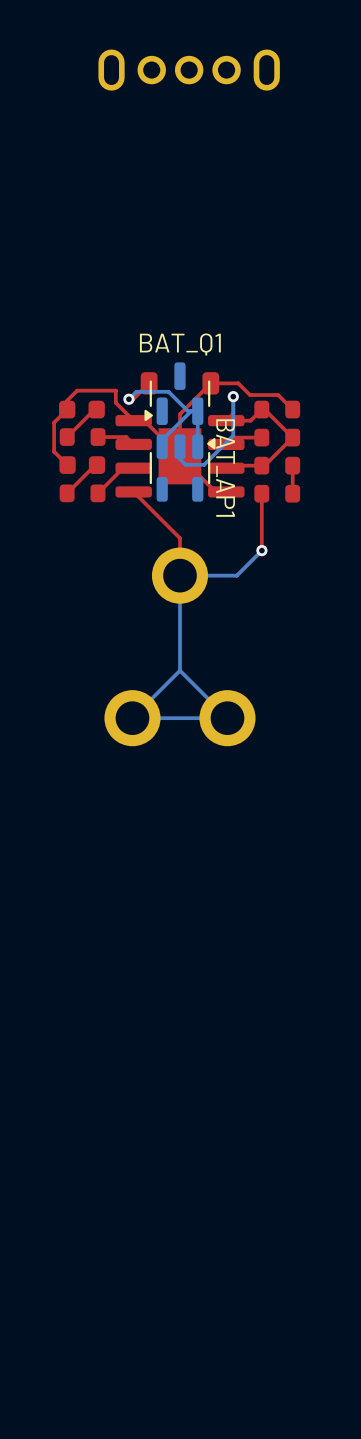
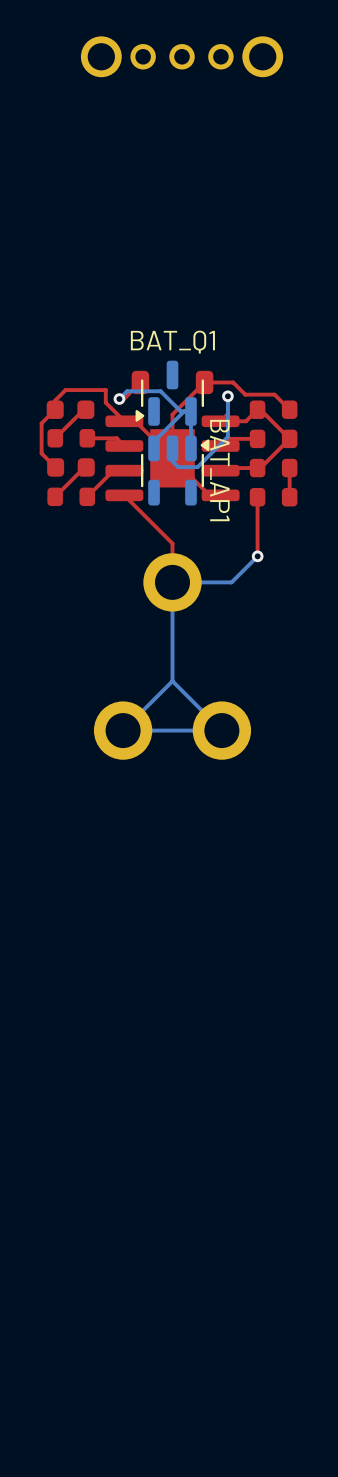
part footprint: [98, 49, 280, 91] -> [80, 36, 284, 78]

